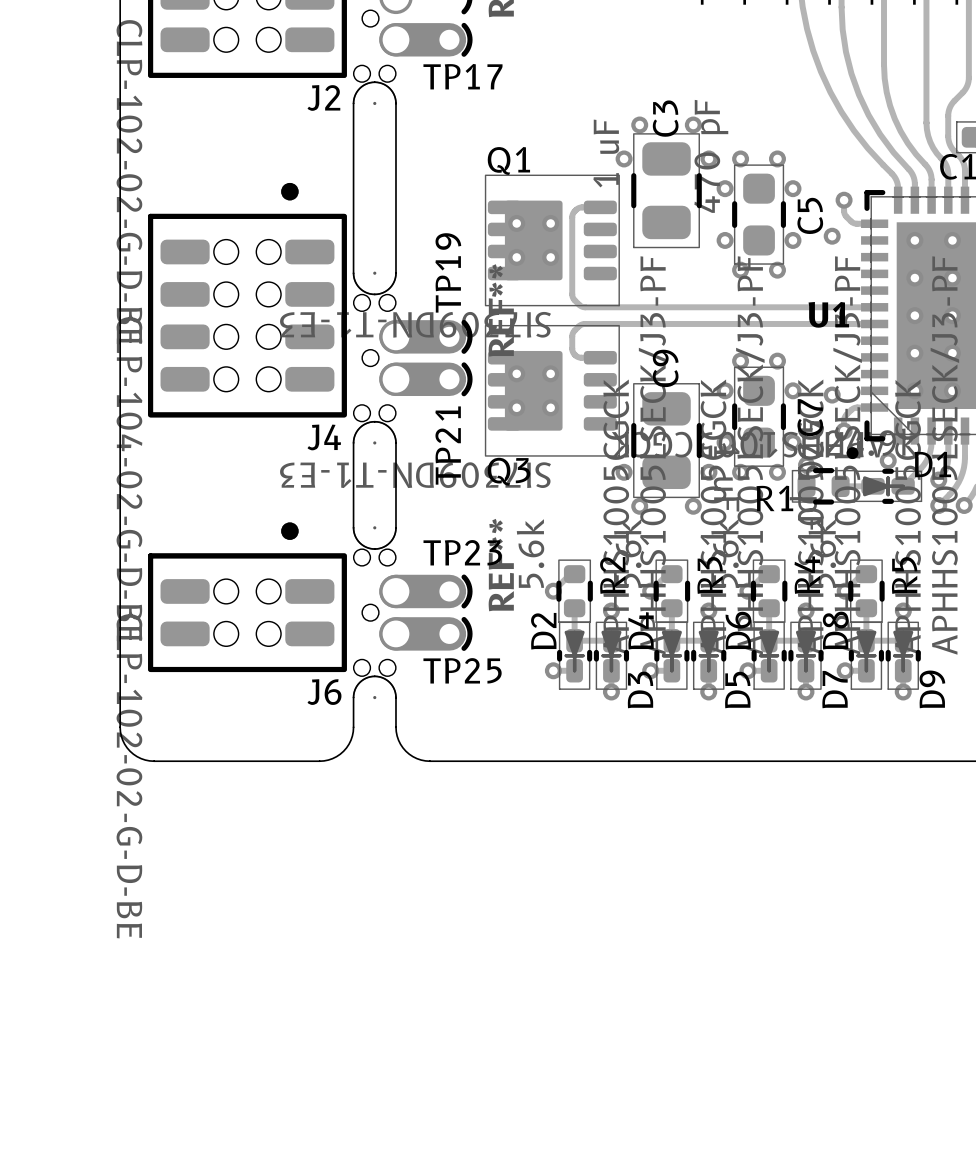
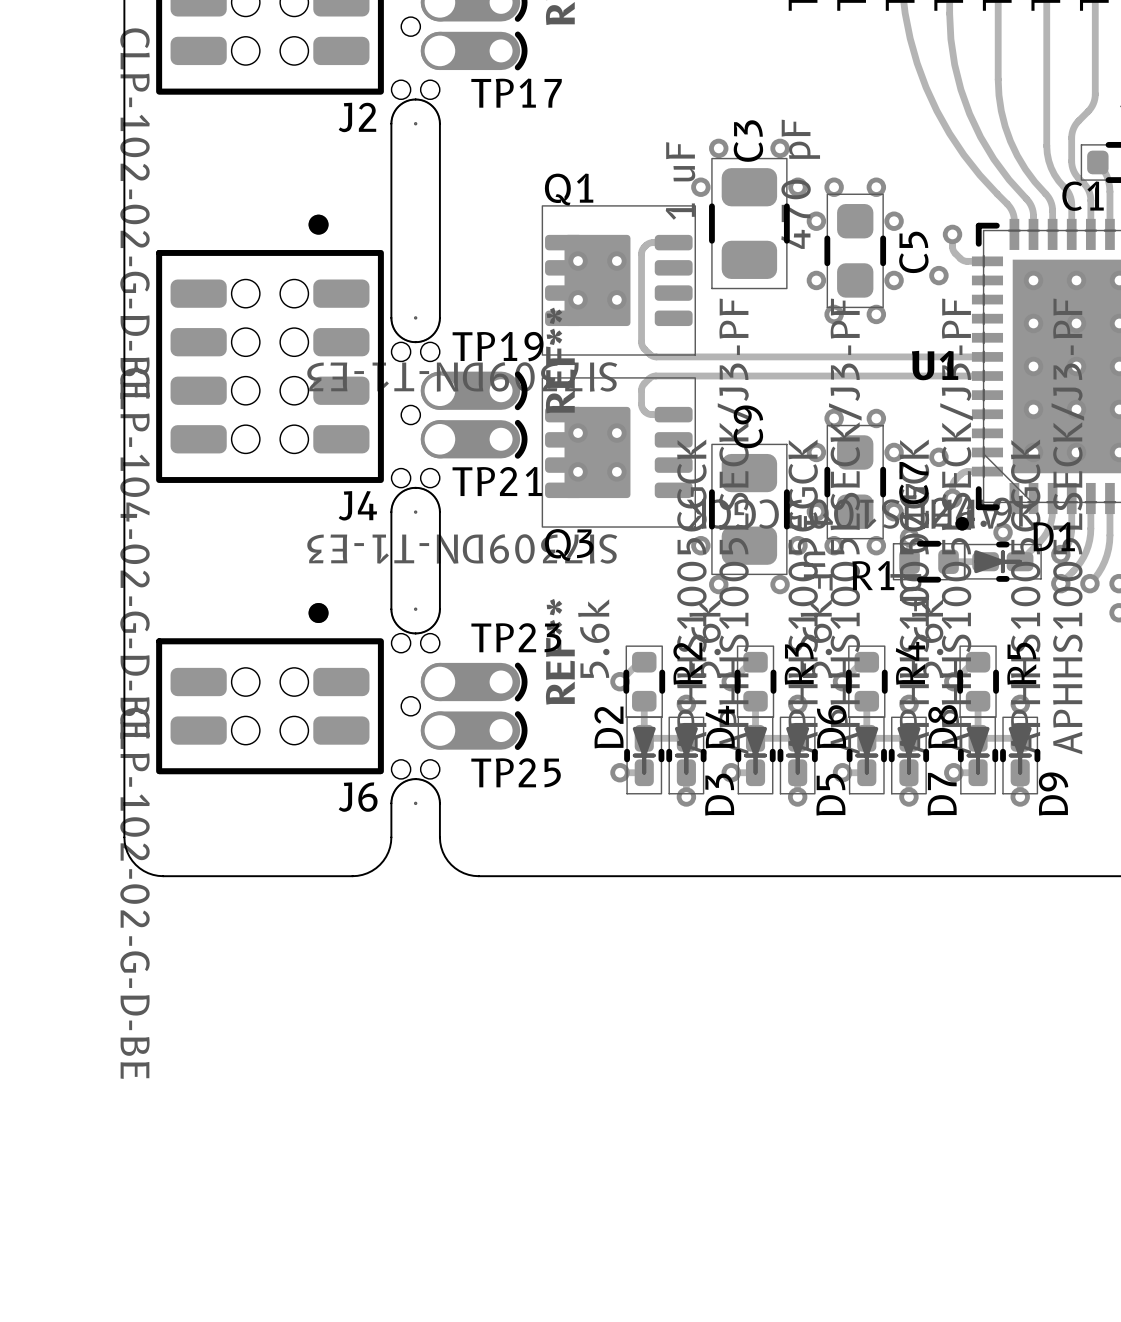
TP19 name rotation: 0° (448, 272) -> 90° clockwise (498, 346)
TP21 name rotation: 0° (448, 445) -> 90° clockwise (497, 481)

